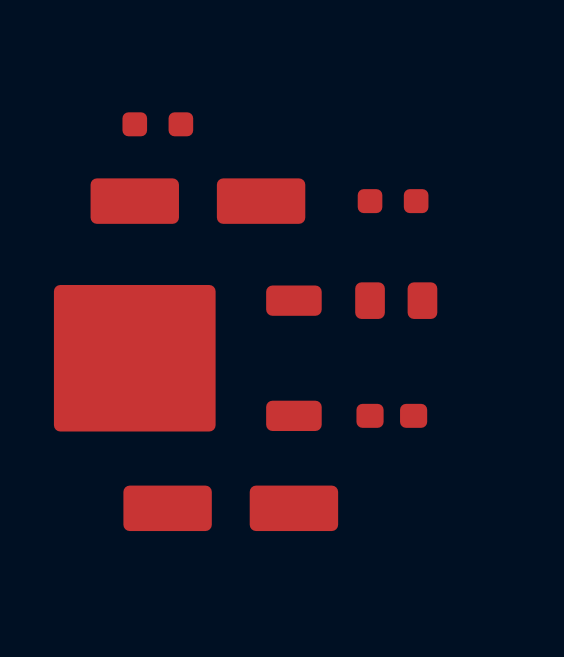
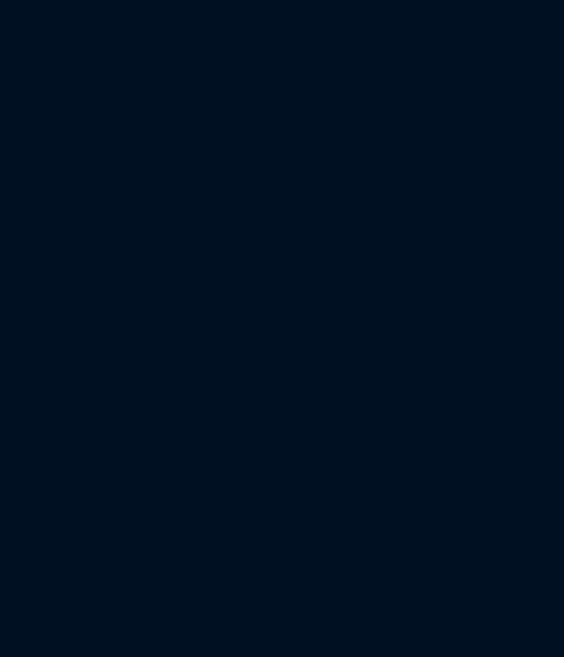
part: (157, 124) -> none
part: (197, 201) -> none
part: (393, 201) -> none
part: (396, 300) -> none
part: (187, 358) -> none
part: (391, 415) -> none
part: (230, 508) -> none

